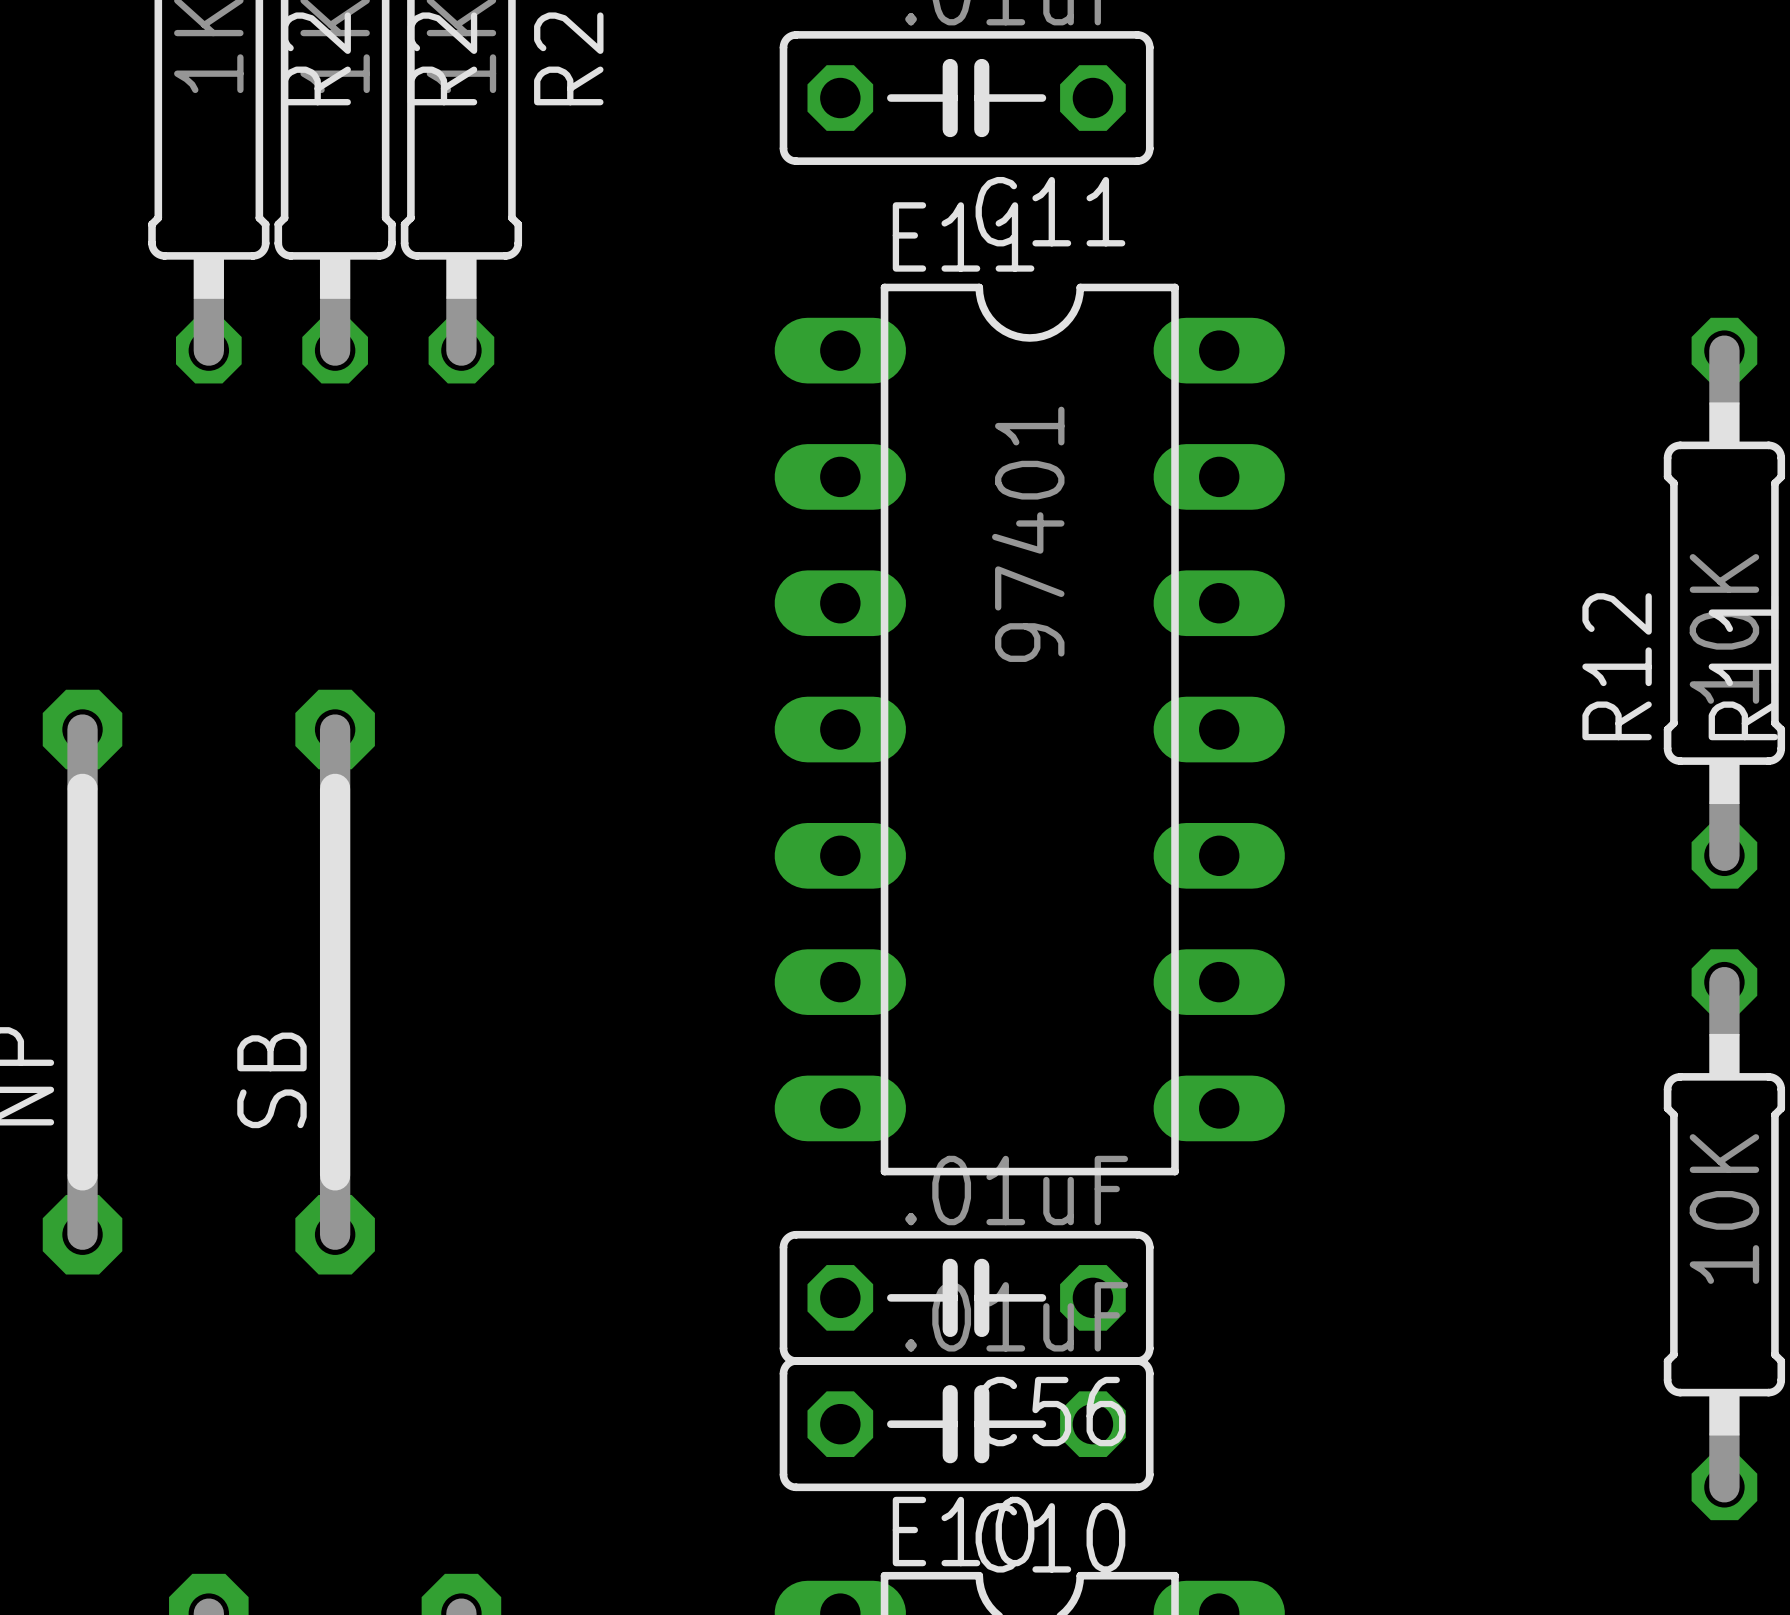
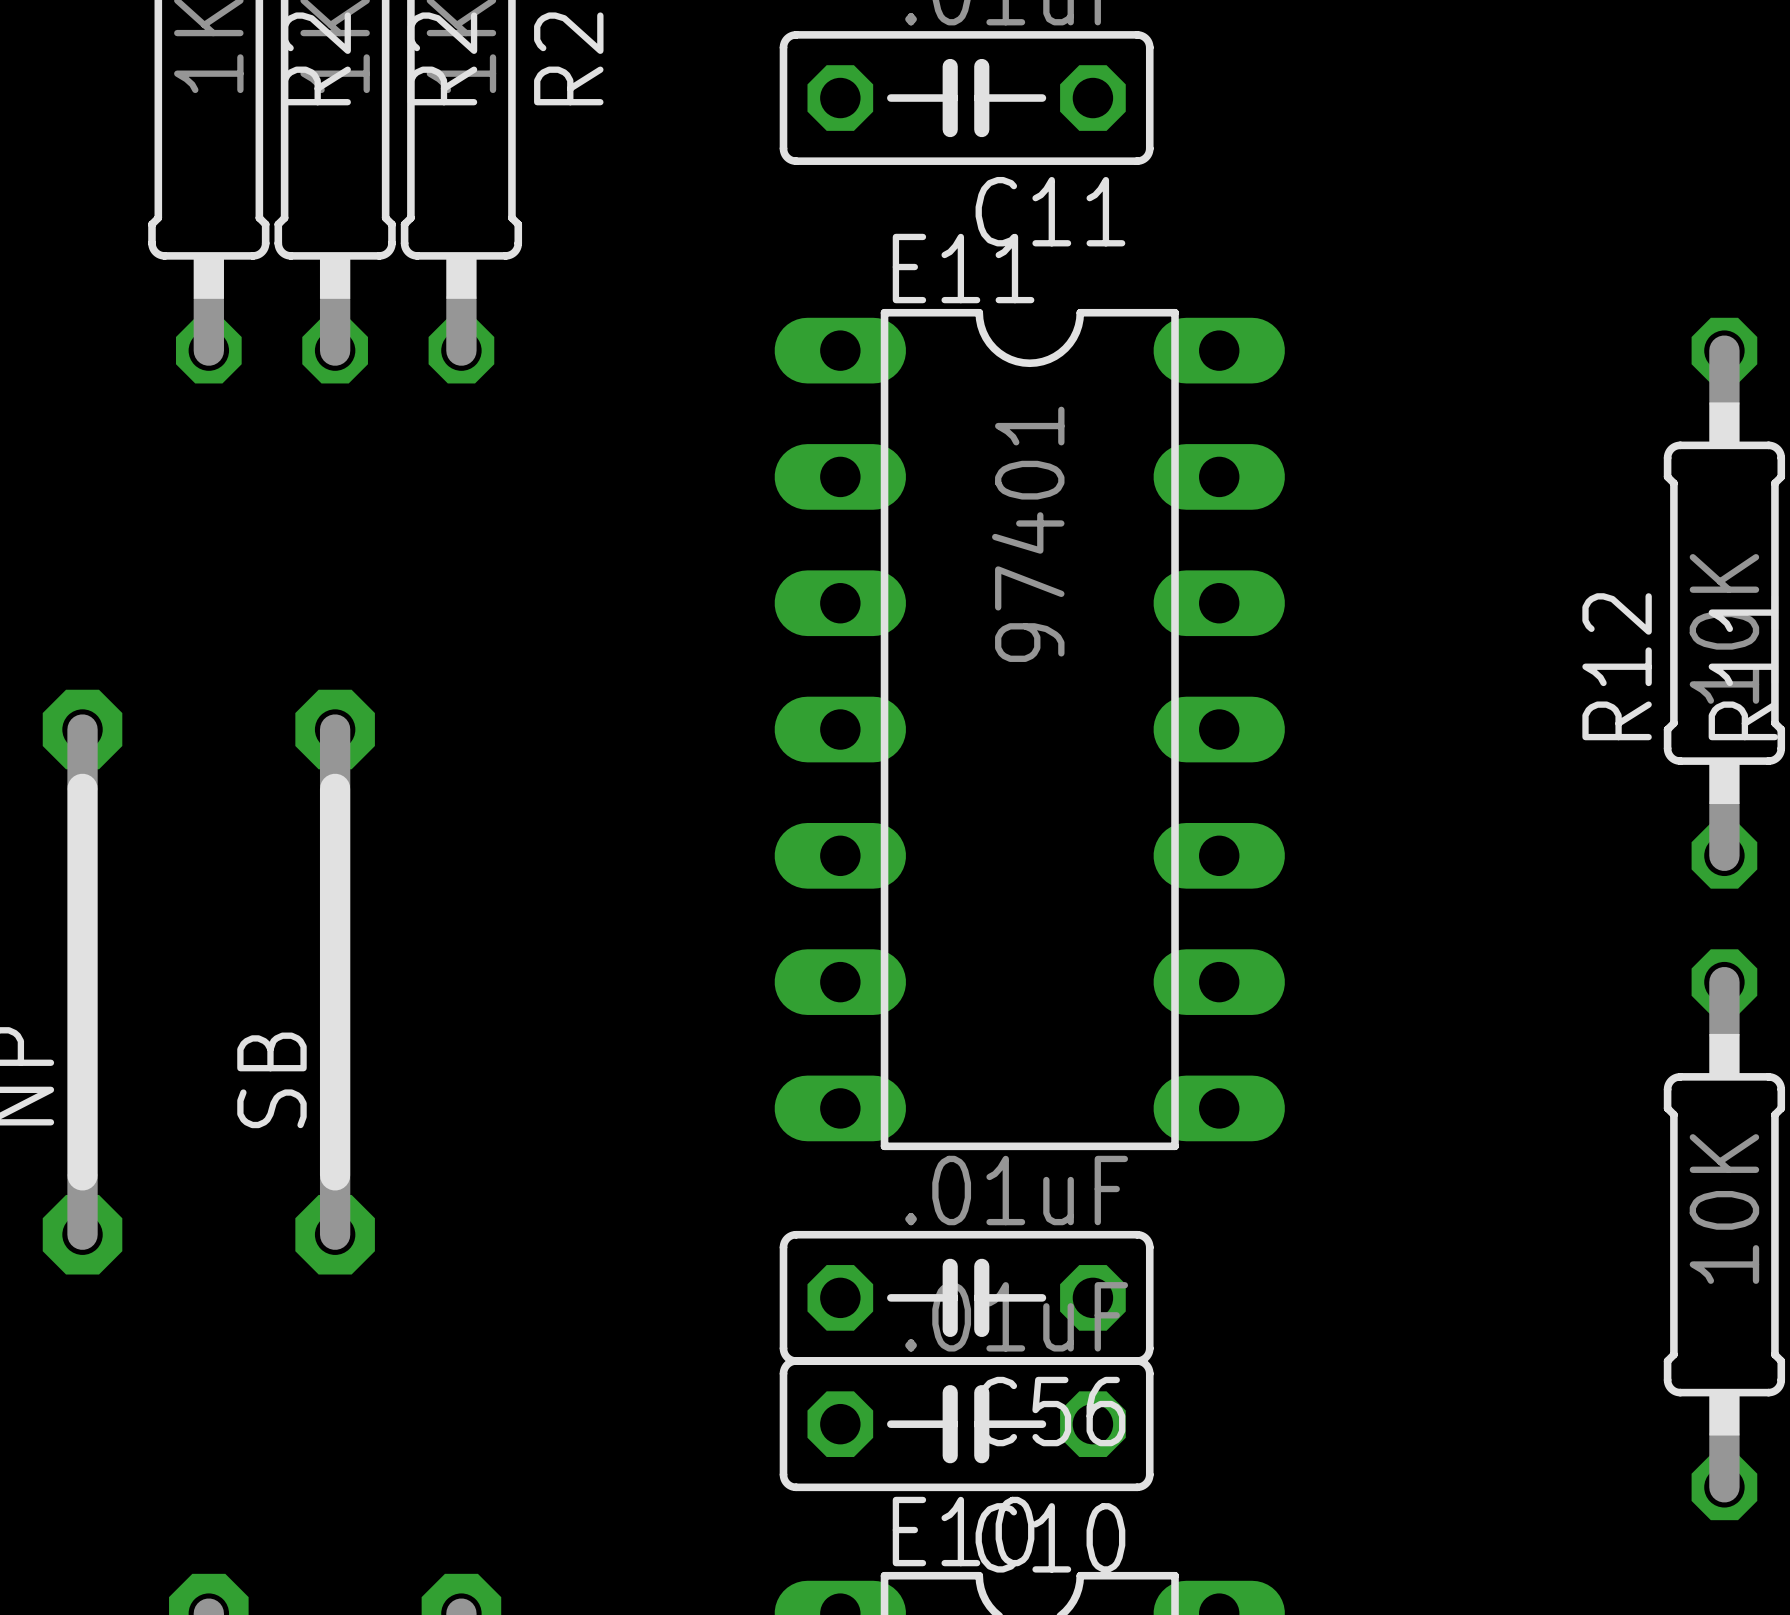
E11 name position: E11 (963, 236) -> E11 (963, 268)
E11 footprint: [774, 283, 1285, 1176] -> [774, 308, 1285, 1151]

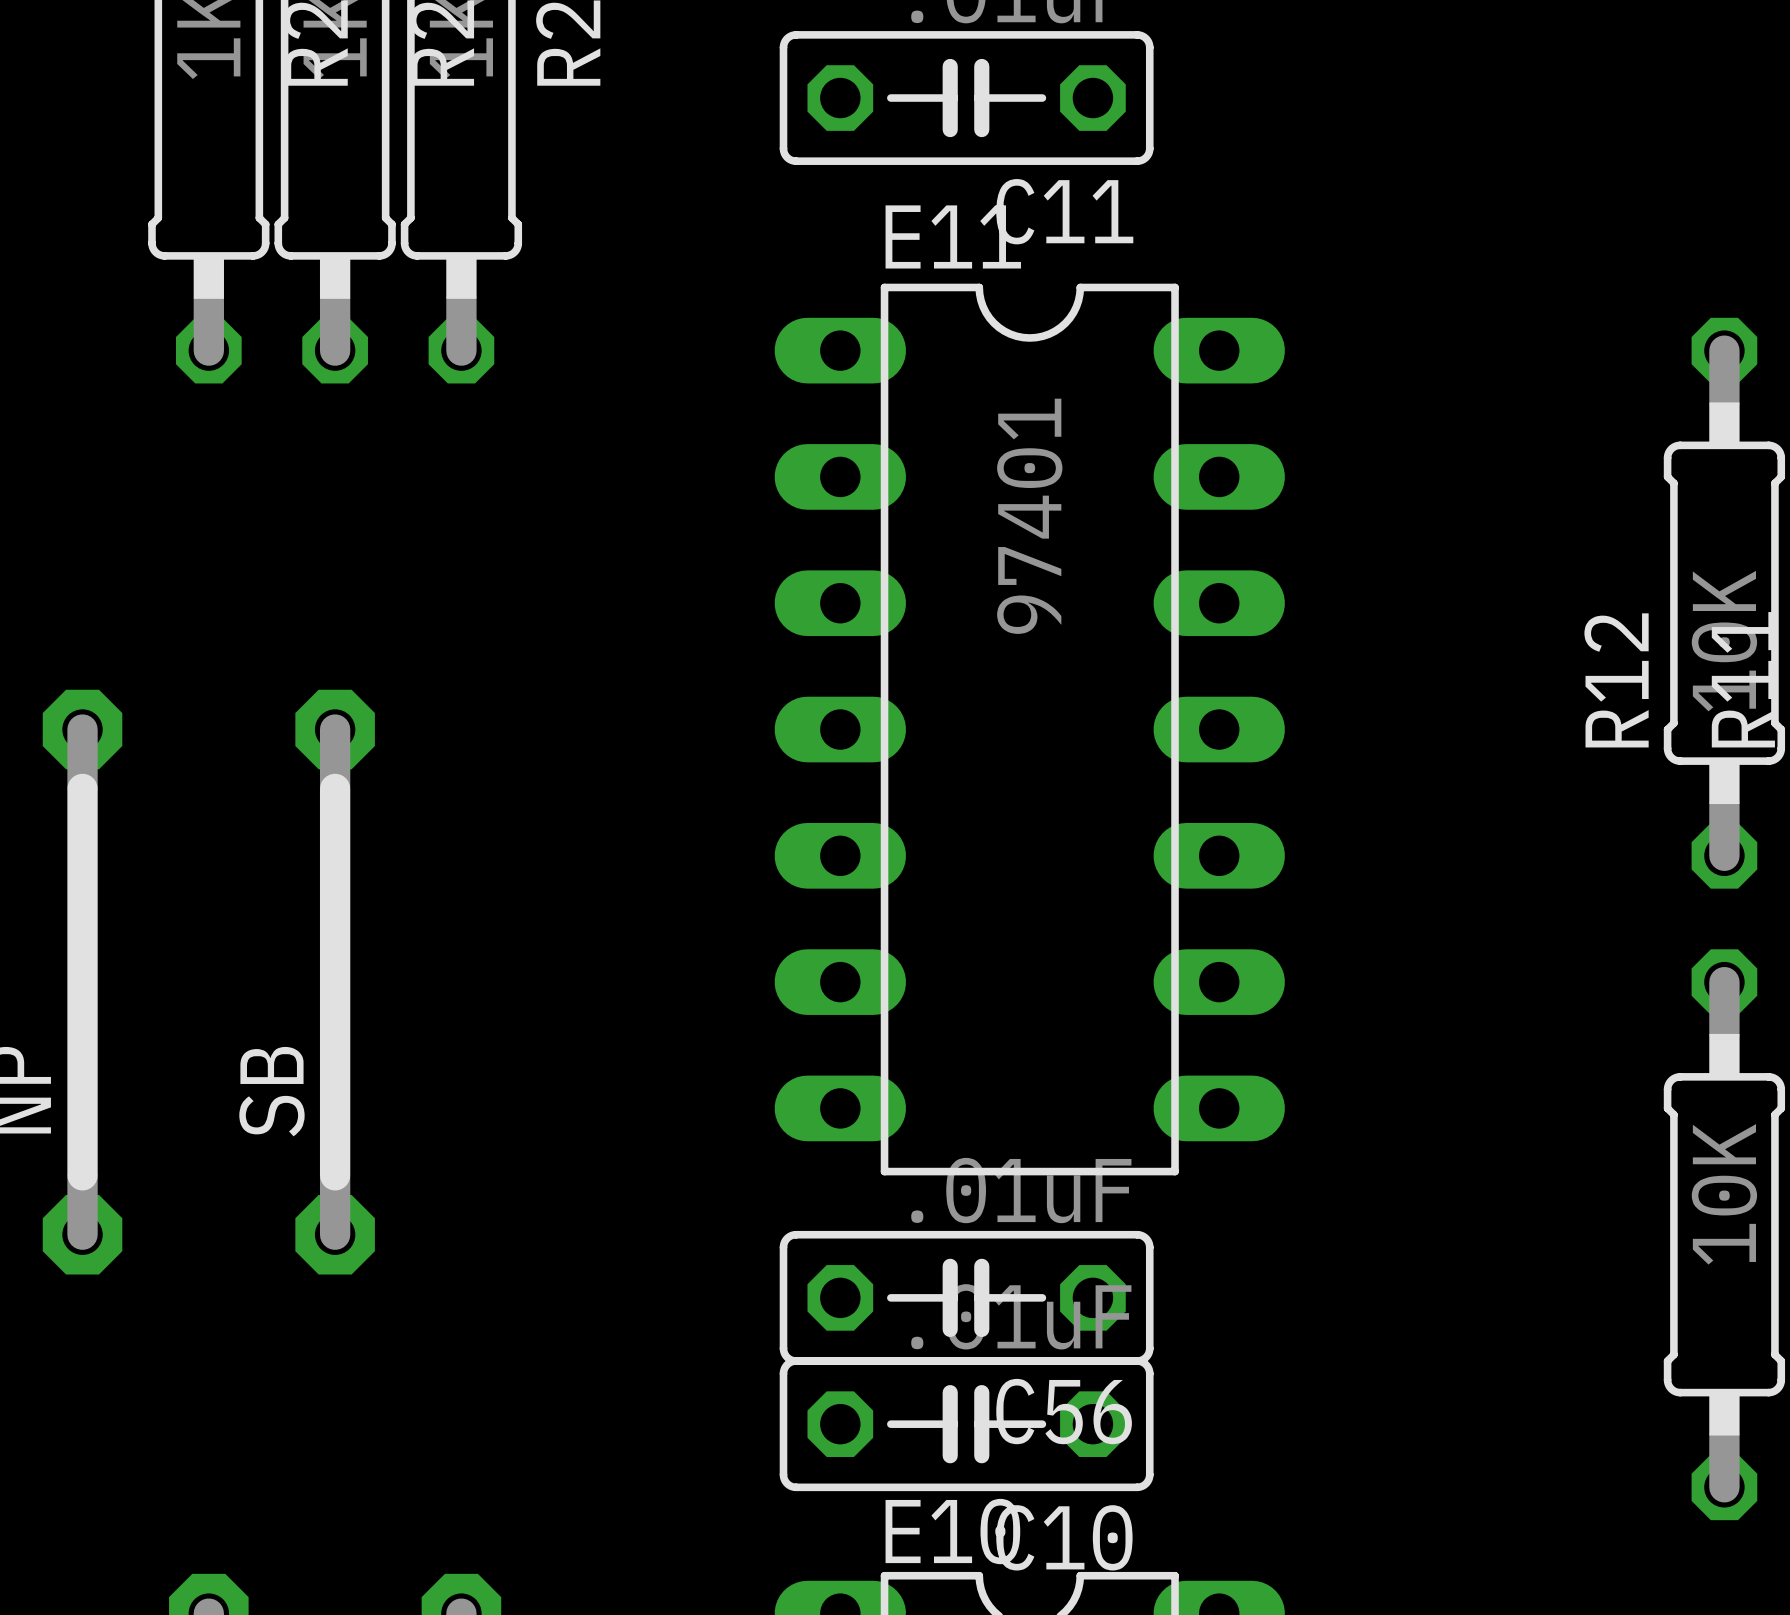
E11 name position: E11 (963, 268) -> E11 (953, 236)
E11 footprint: [774, 308, 1285, 1151] -> [774, 283, 1285, 1176]

